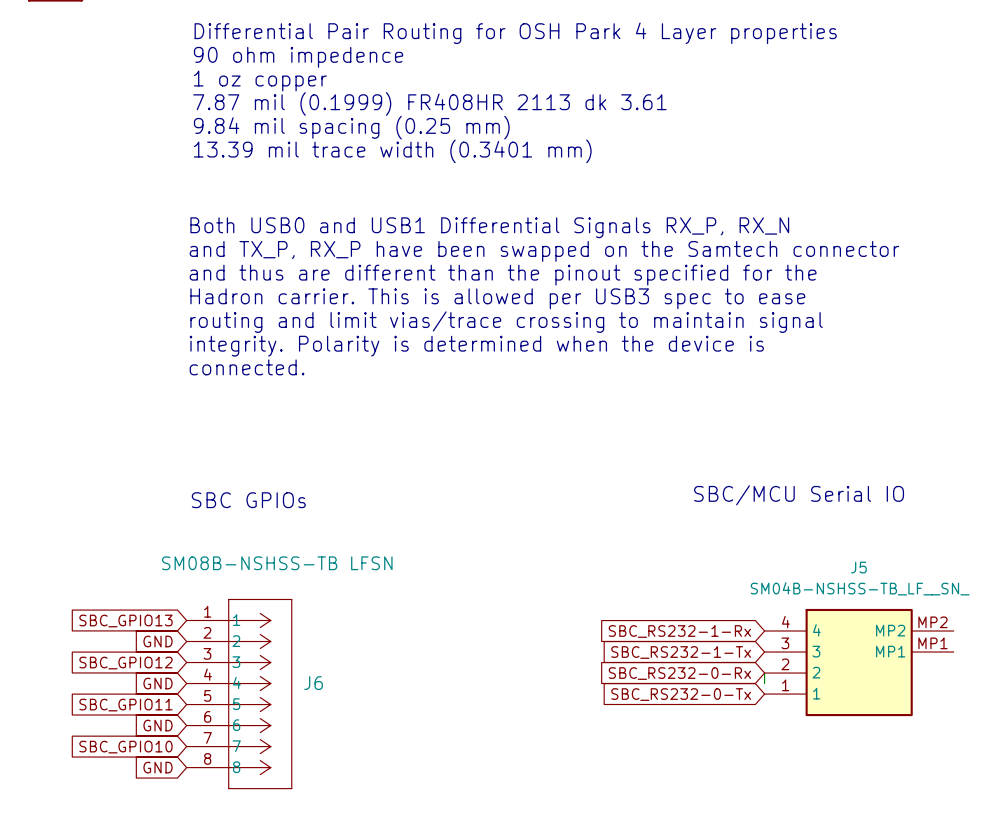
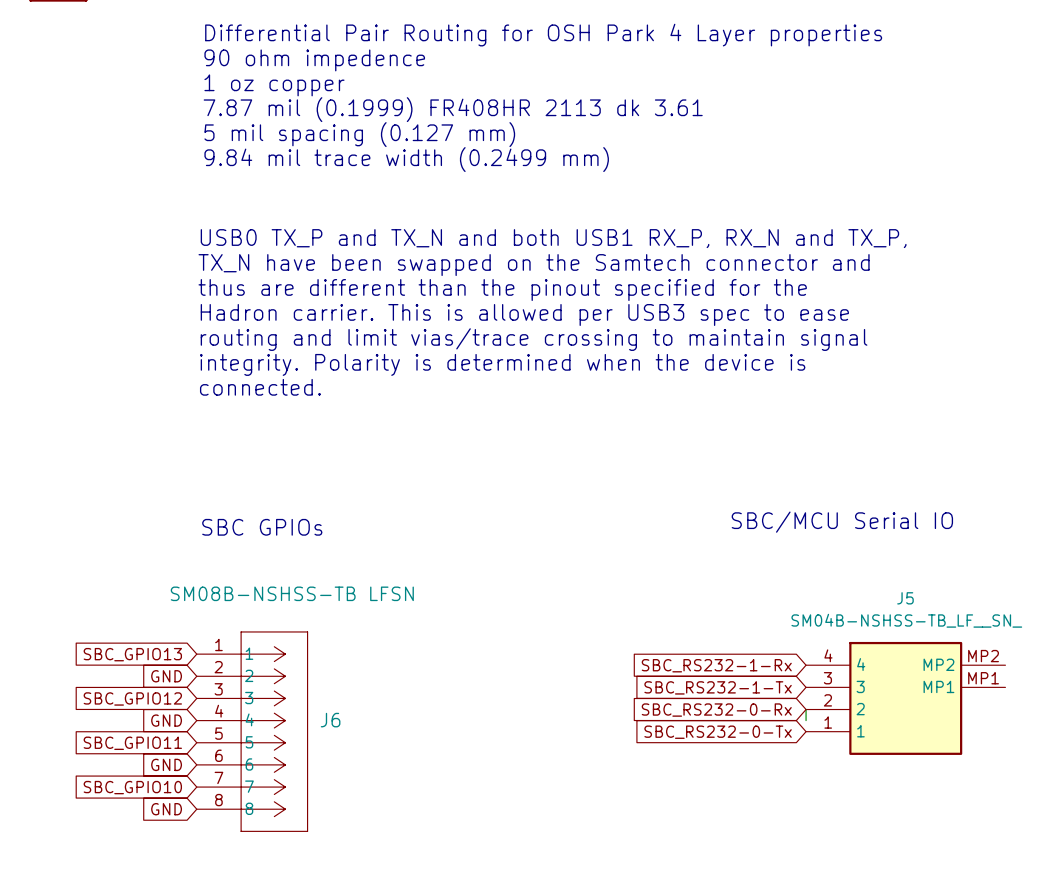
text: 9.84 mil spacing (0.25 mm) (351, 127) -> 5 mil spacing (0.127 mm) (359, 134)
text: 13.39 mil trace width (0.3401 mm) (392, 151) -> 9.84 mil trace width (0.2499 mm) (406, 159)
text: Both USB0 and USB1 Differential Signals RX_P, RX_N (489, 227) -> USB0 TX_P and TX_N and both USB1 RX_P, RX_N and TX_P, (553, 238)
text: and TX_P, RX_P have been swapped on the Samtech connector (544, 251) -> TX_N have been swapped on the Samtech connector and (534, 265)
text: and thus are different than the pinout specified for the (503, 275) -> thus are different than the pinout specified for the (502, 290)

